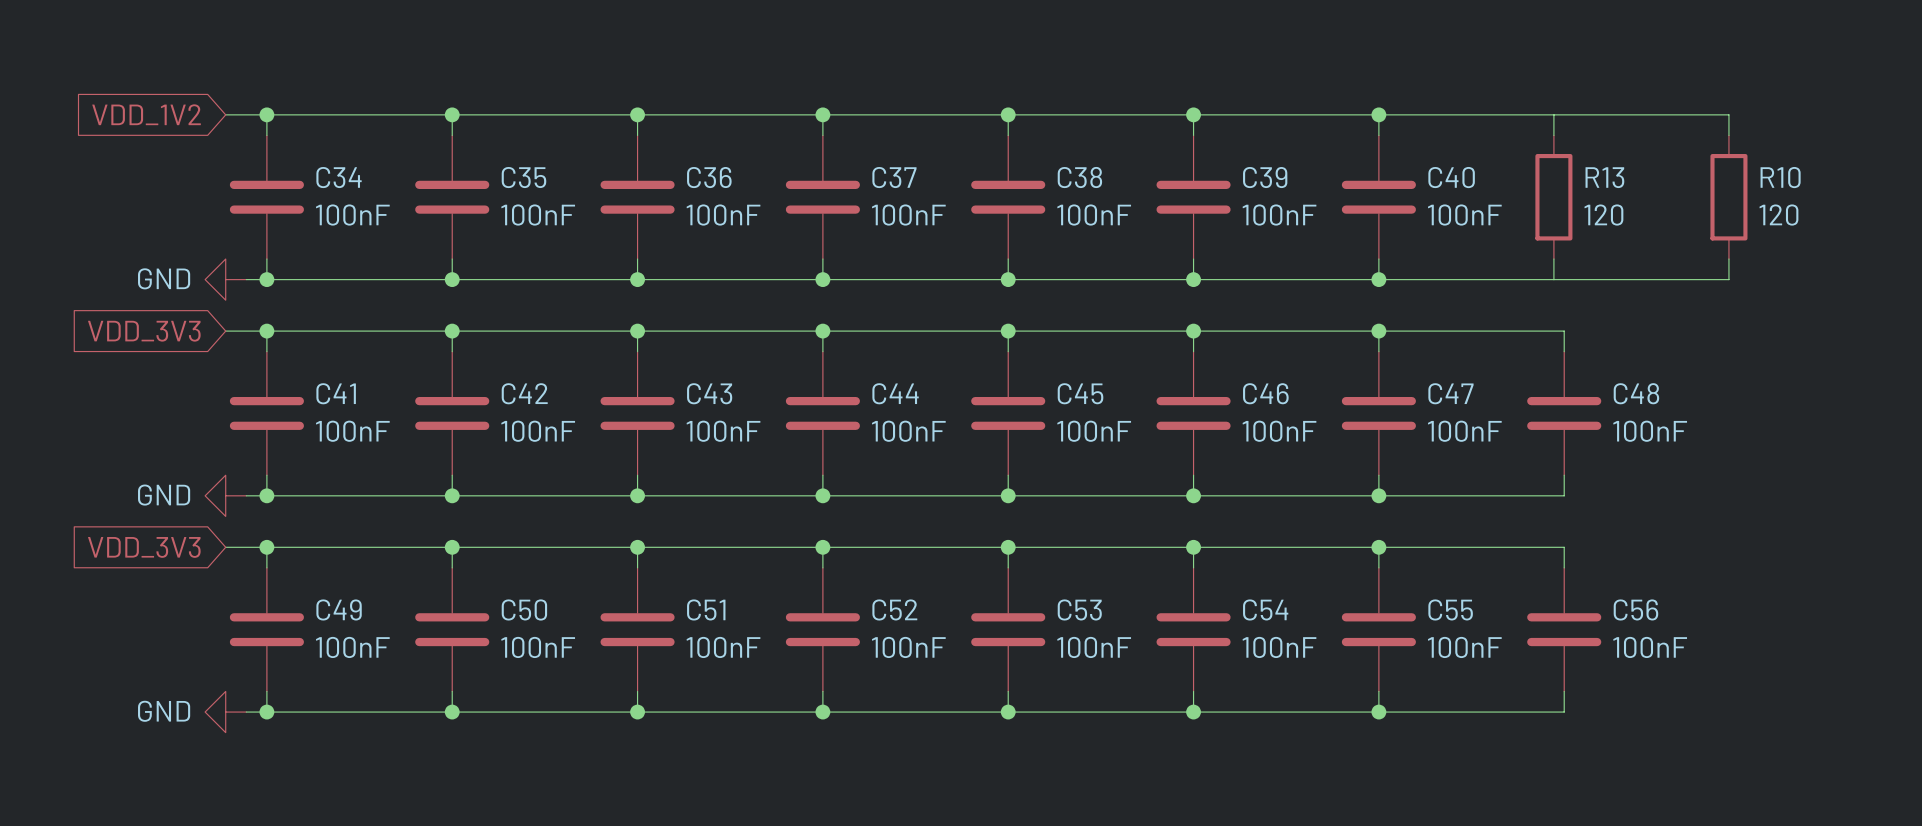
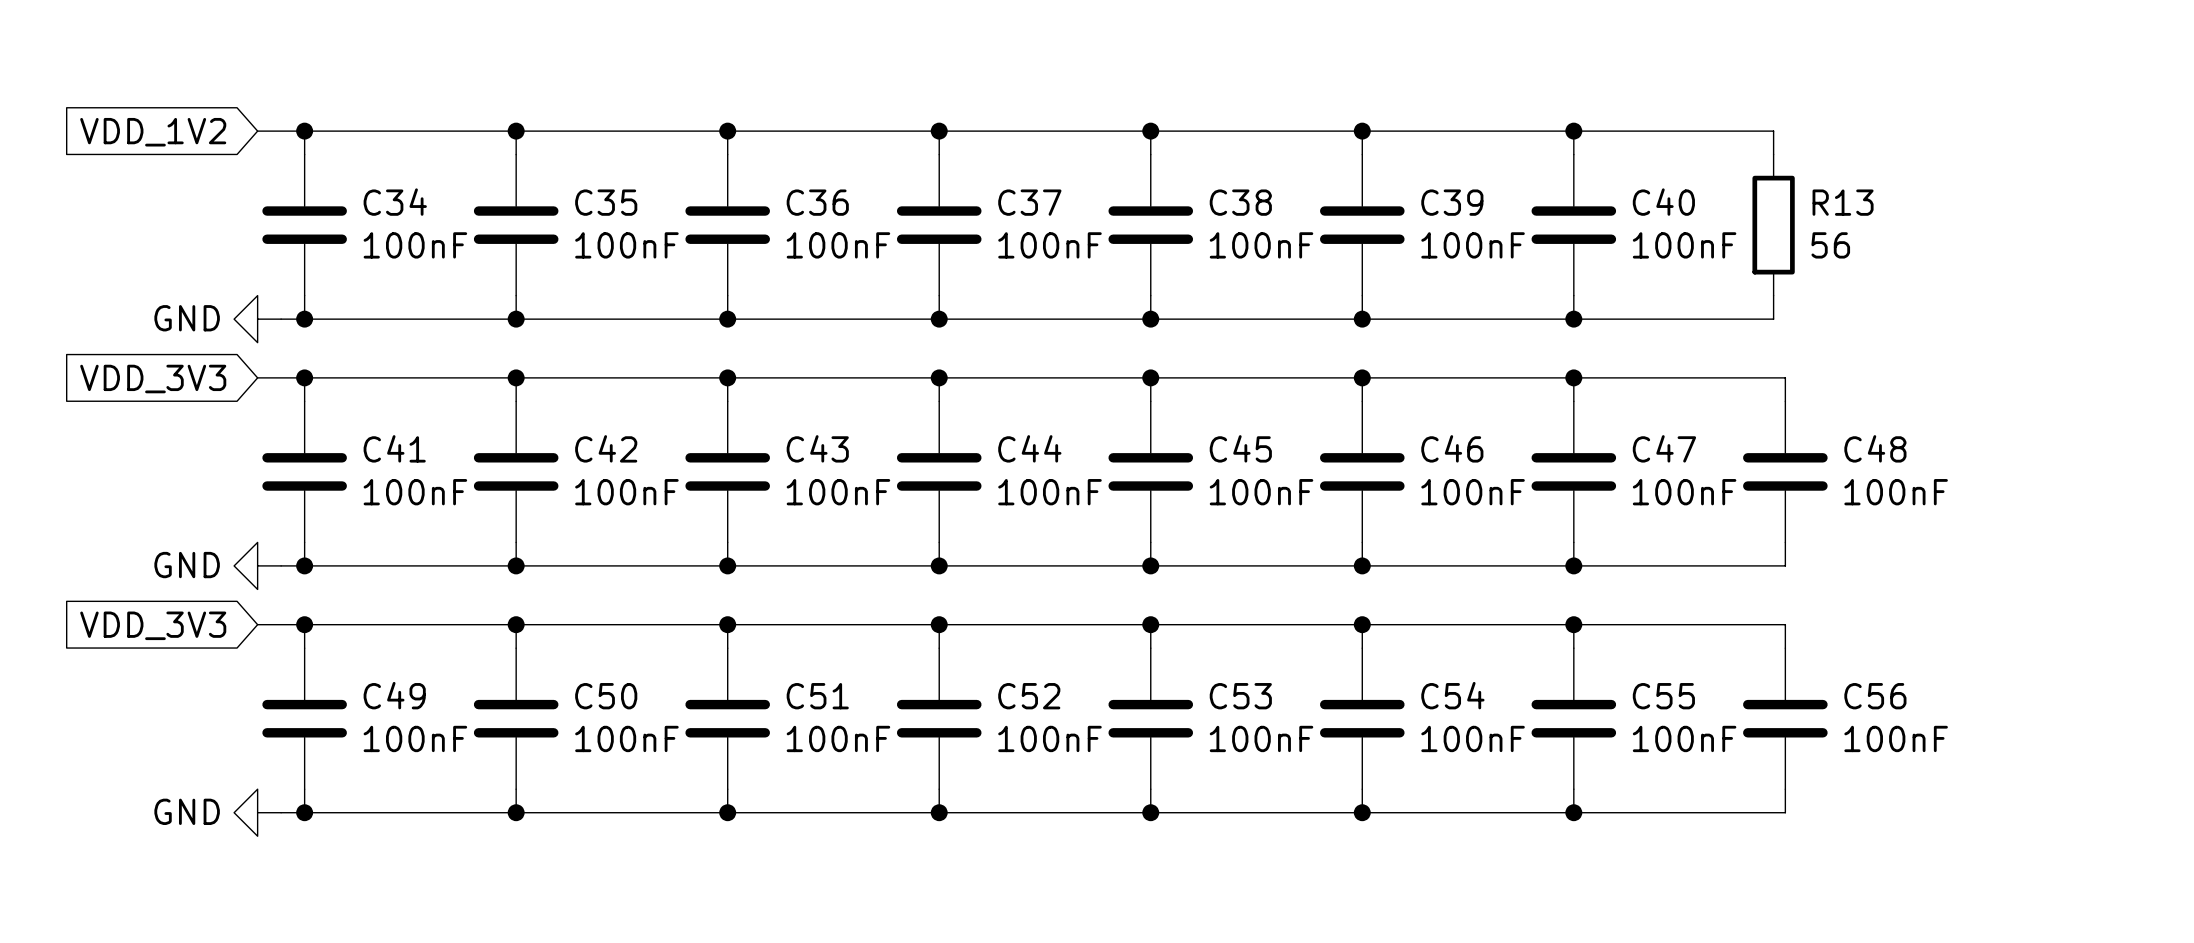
wire: (1553, 114) (1728, 114) (1728, 135) -> none
R10: 120 (1728, 197) -> none
R13 value: 120 (1603, 215) -> 56 (1830, 245)
wire: (1728, 259) (1728, 279) (1553, 279) -> none

